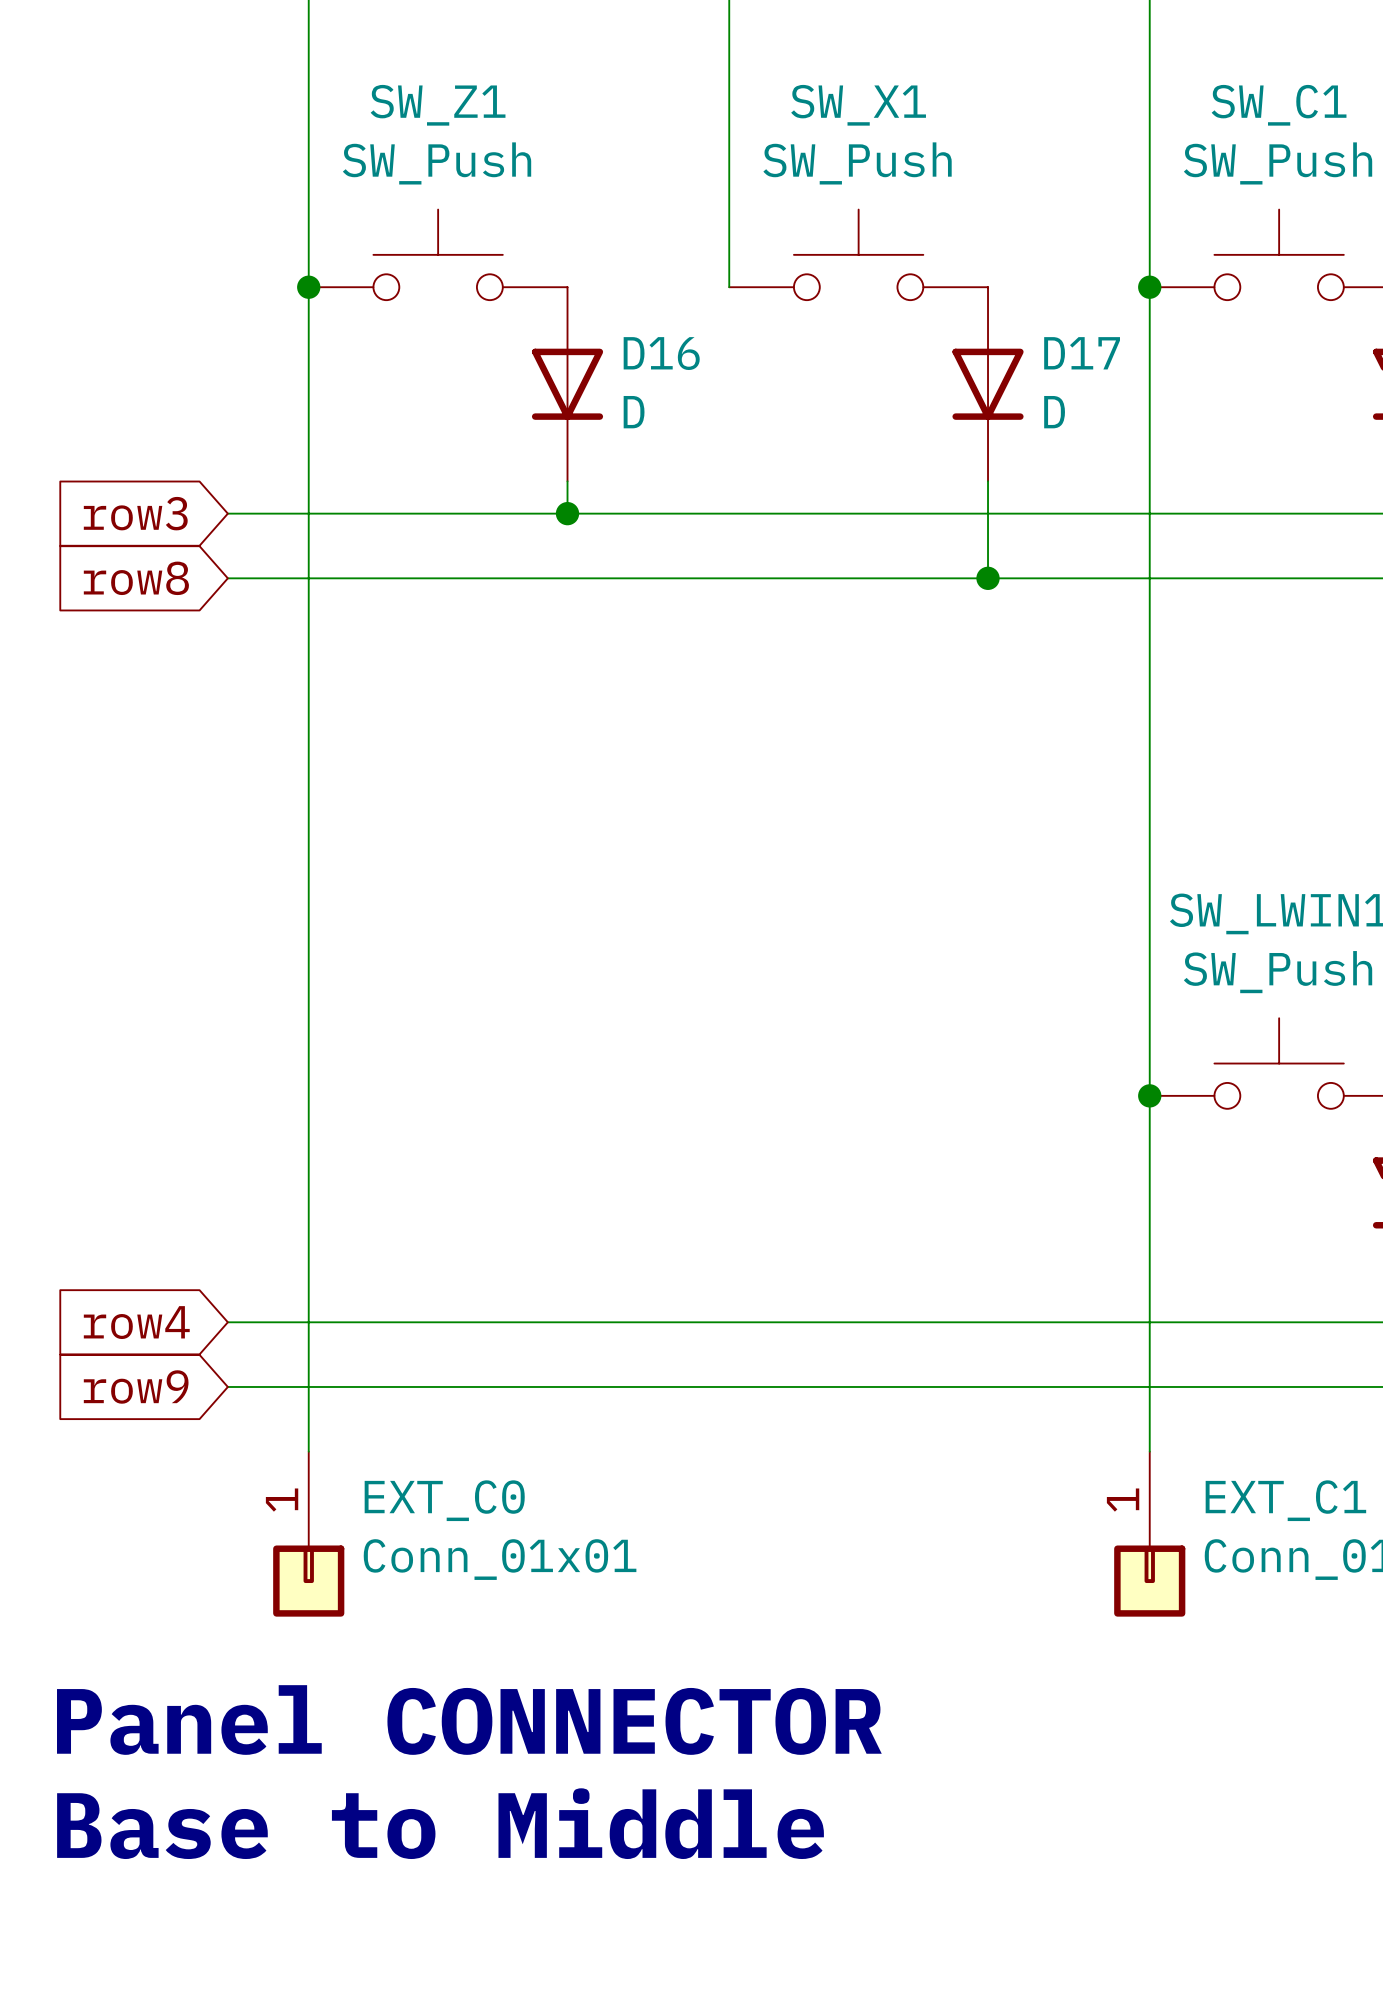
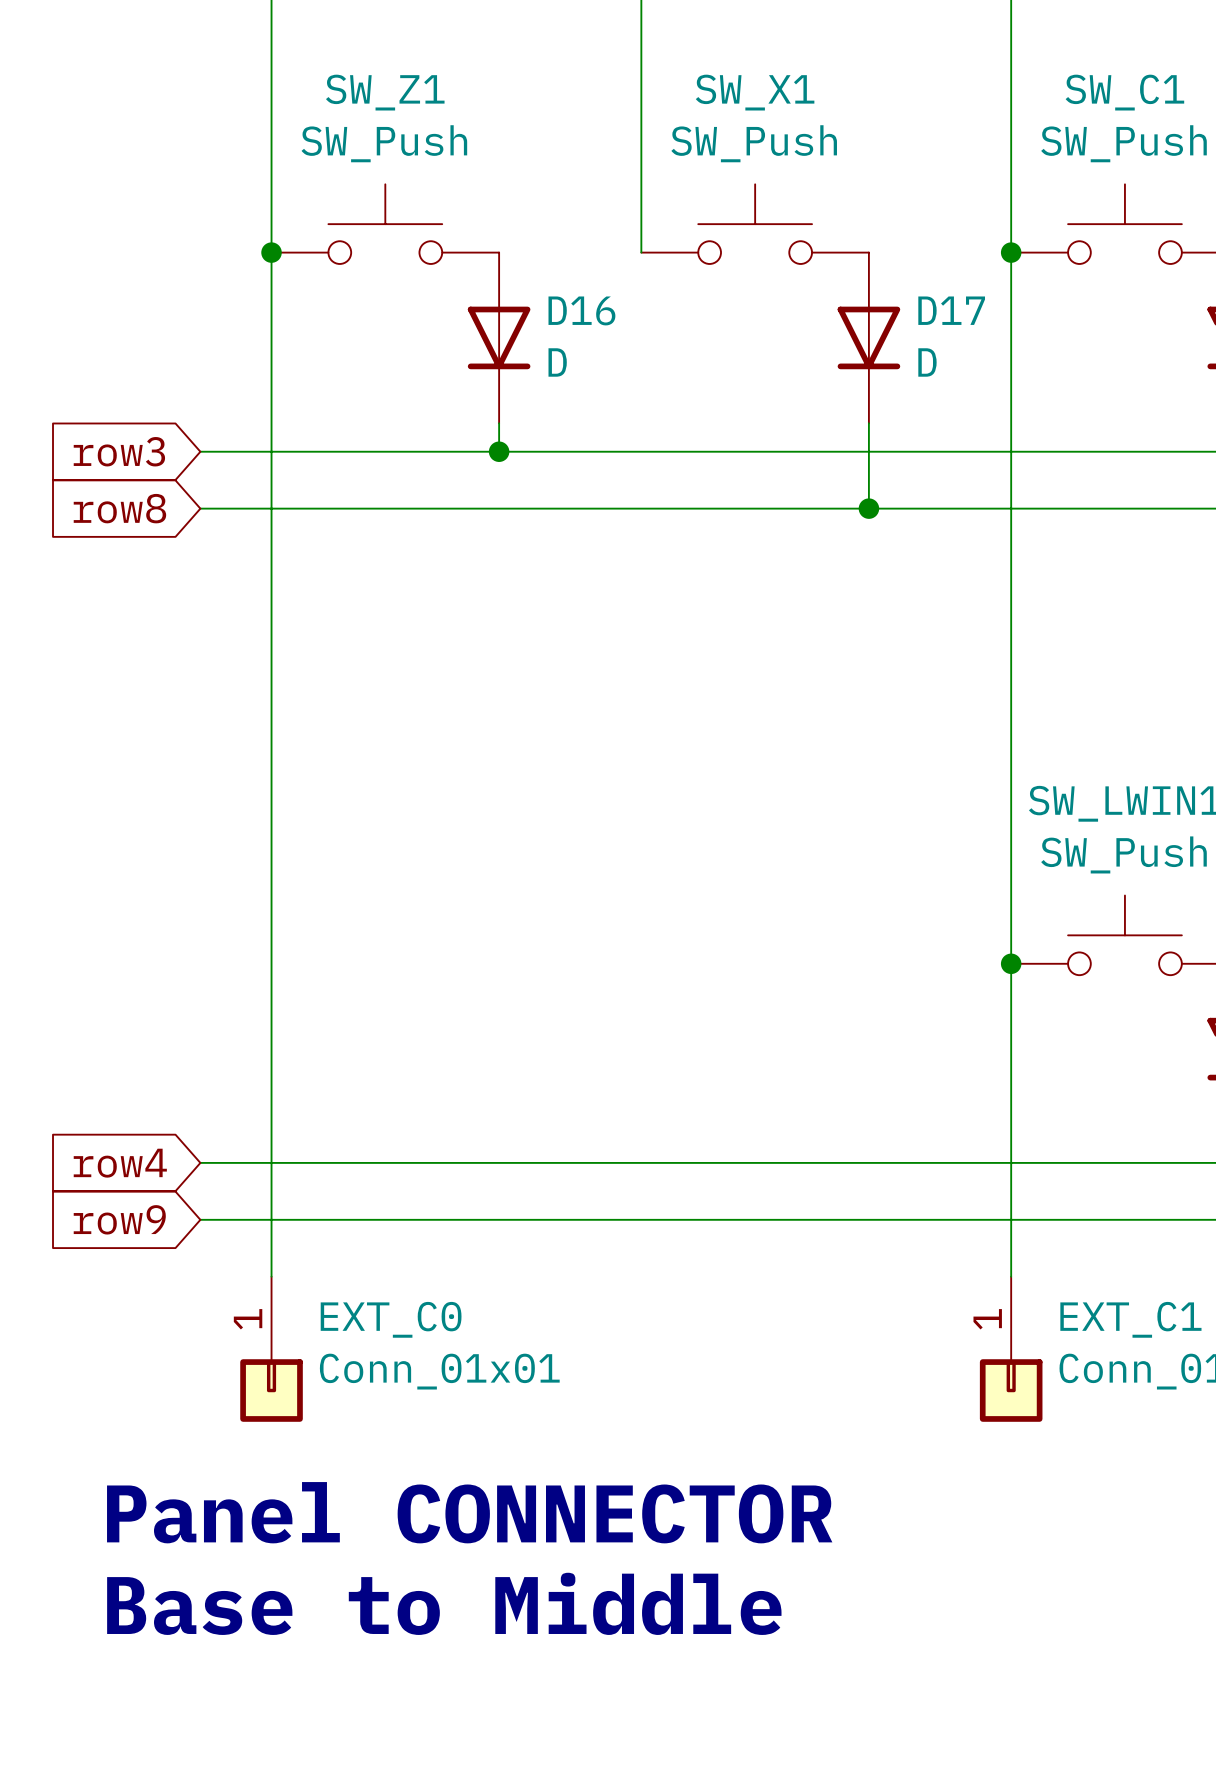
text position: Panel CONNECTOR (469, 1720) -> Panel CONNECTOR (469, 1512)
text position: Base to Middle (440, 1823) -> Base to Middle (444, 1603)

